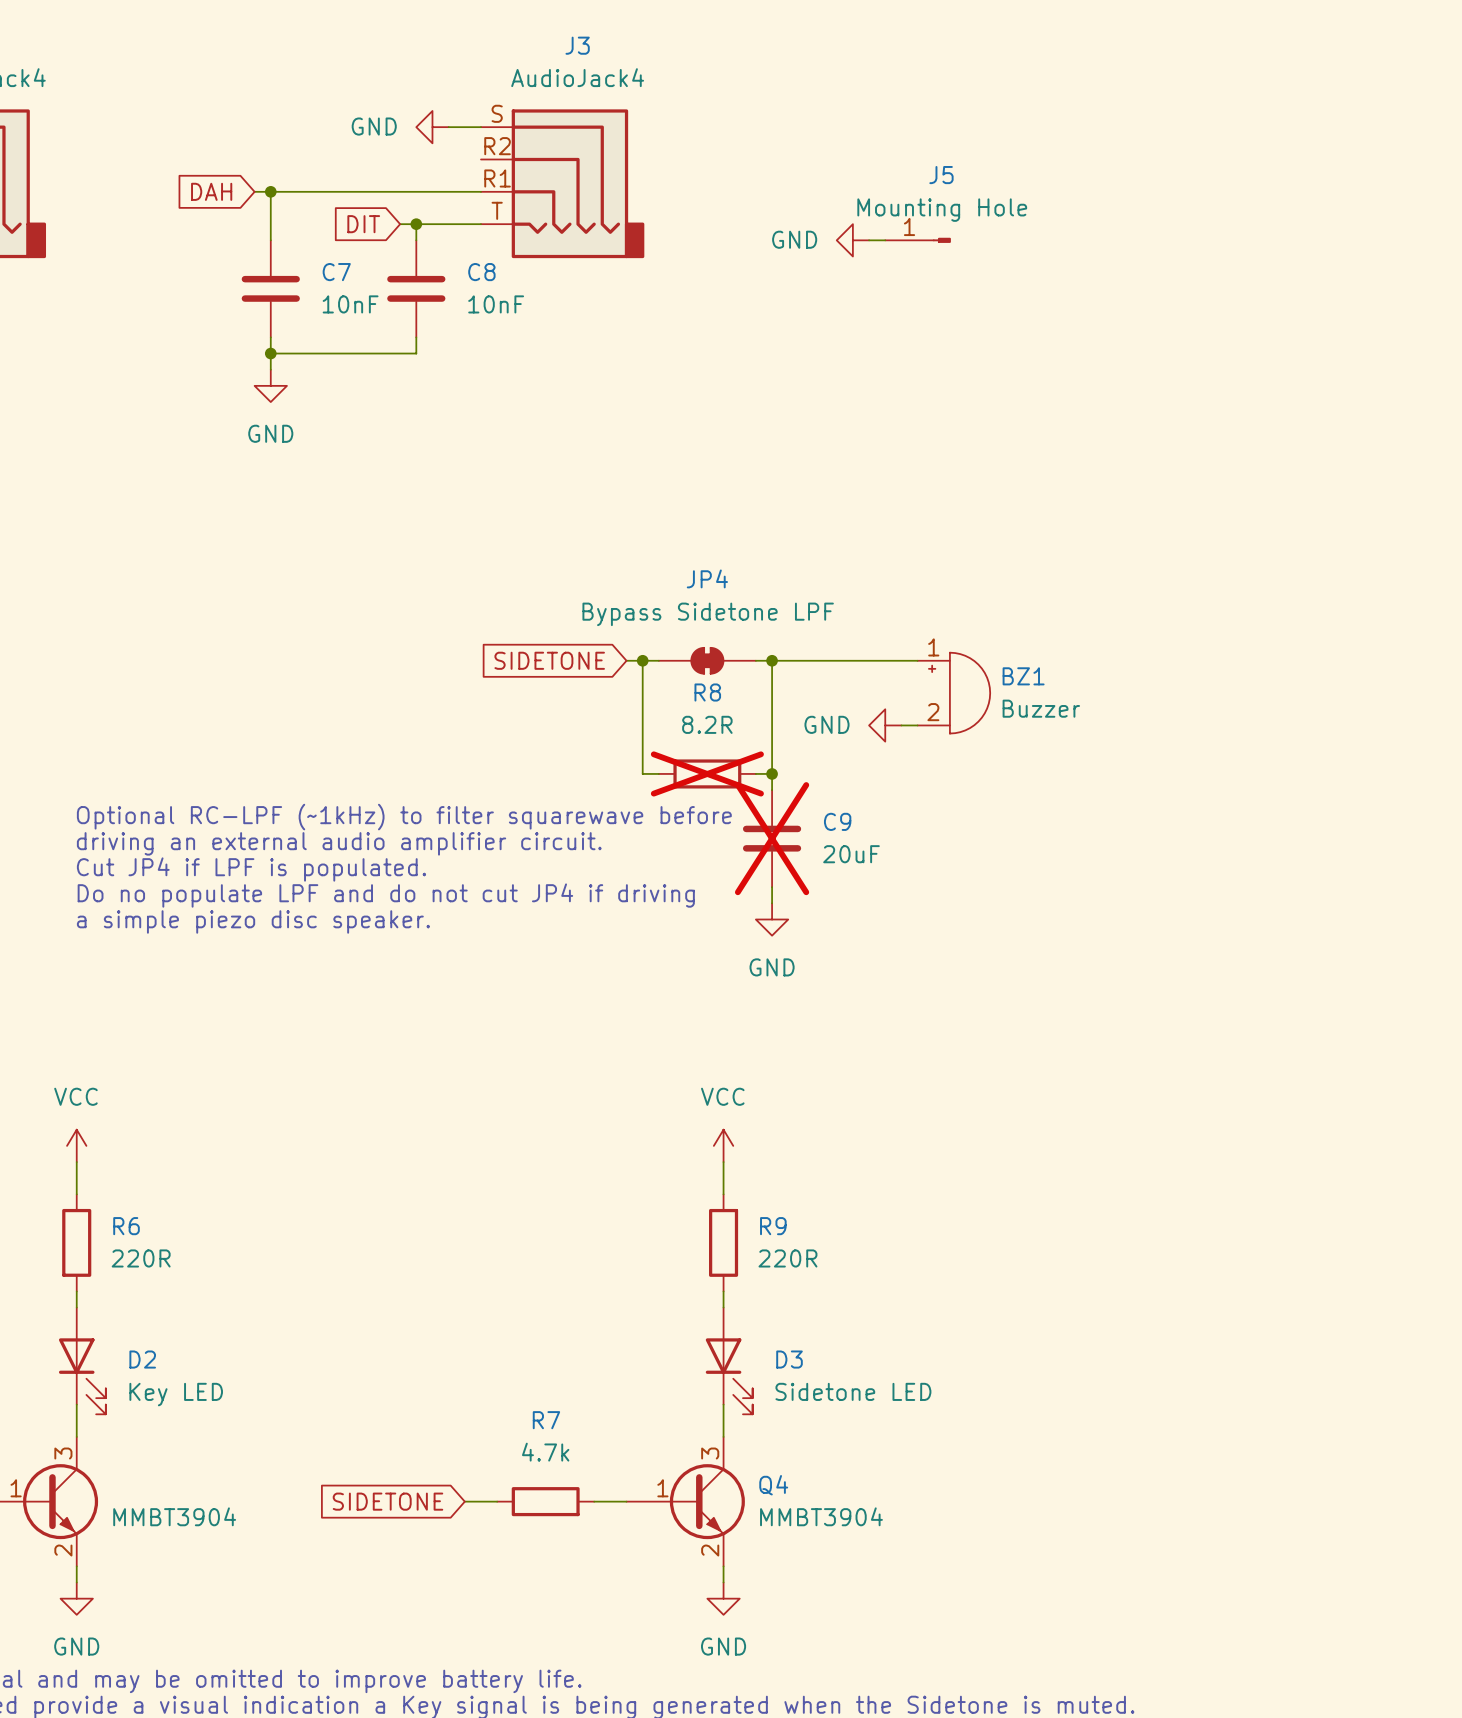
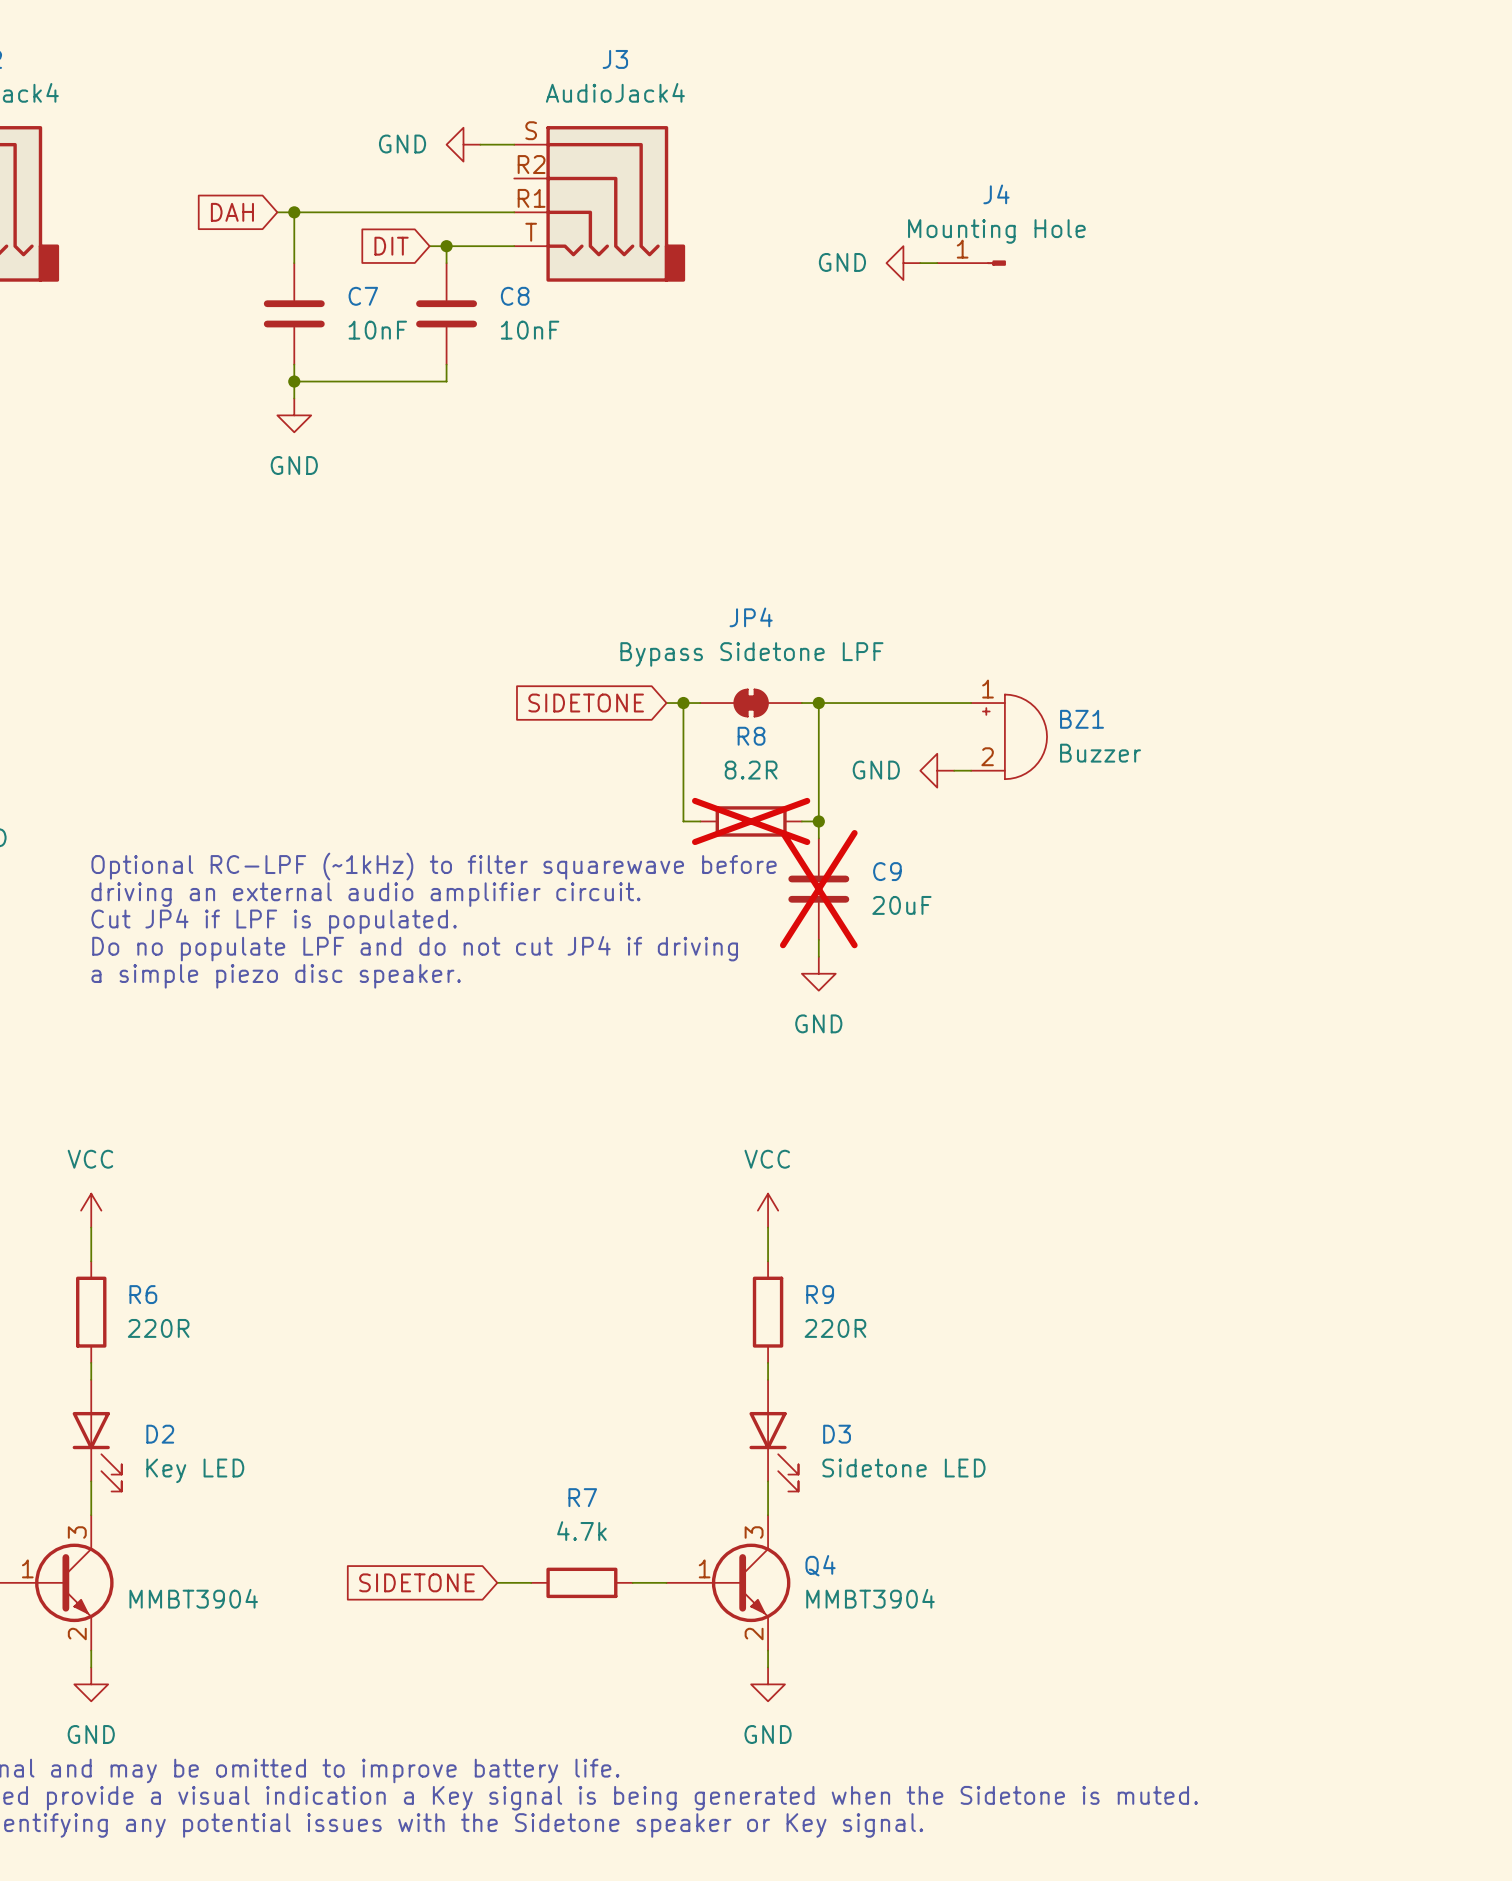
J5 name: J5 (941, 175) -> J4 (996, 194)

